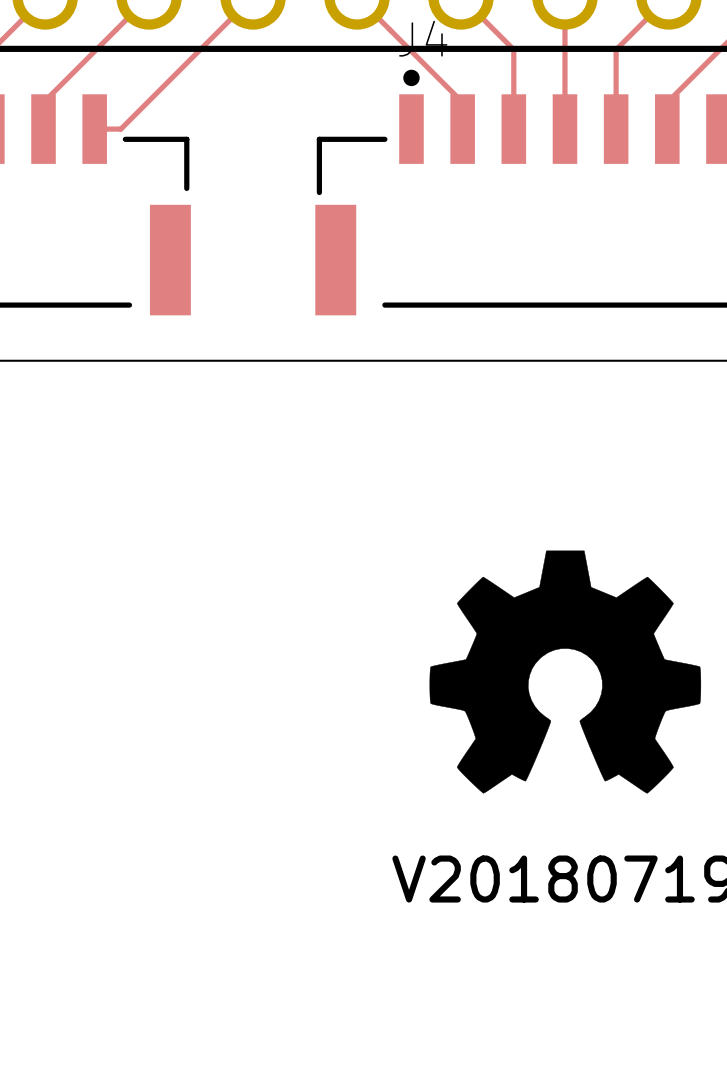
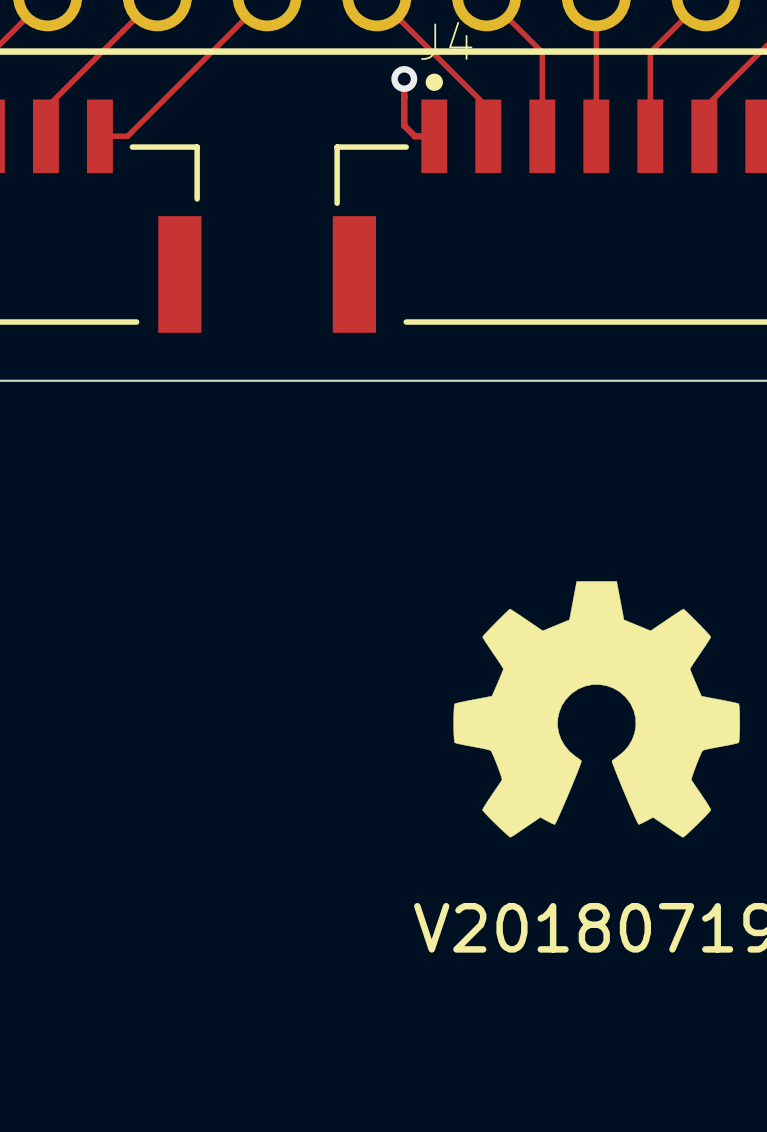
track: none -> (404, 79) (404, 125) (414, 136) (434, 136)
via: none -> (404, 79)

